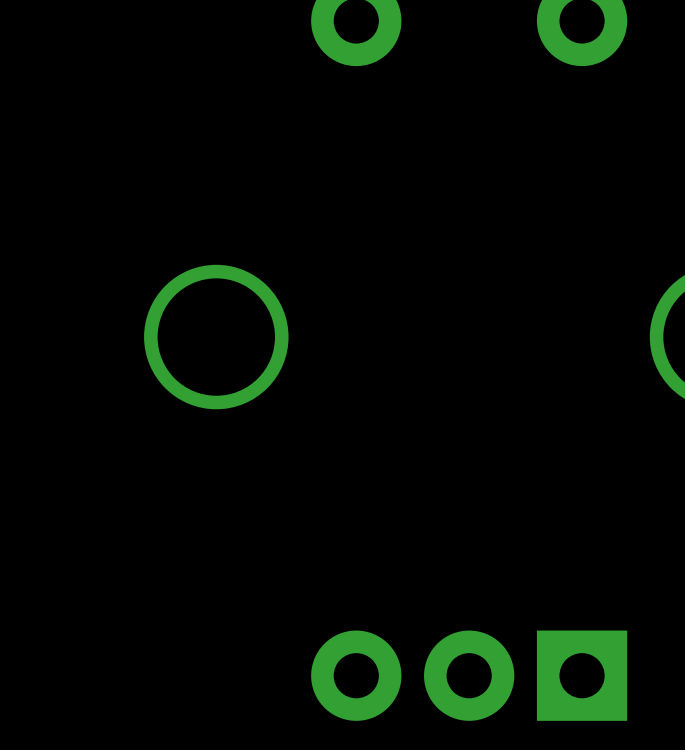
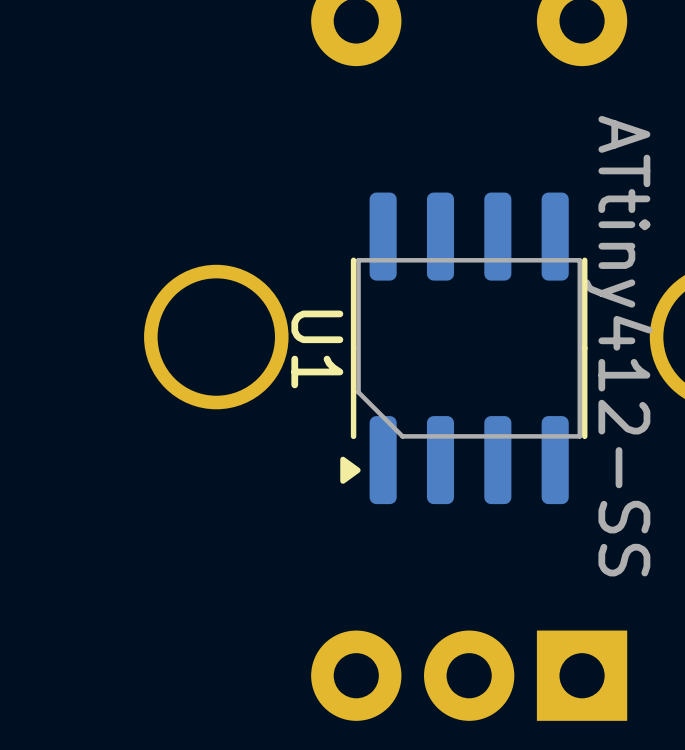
U1: none -> ATtiny412-SS (463, 348)

